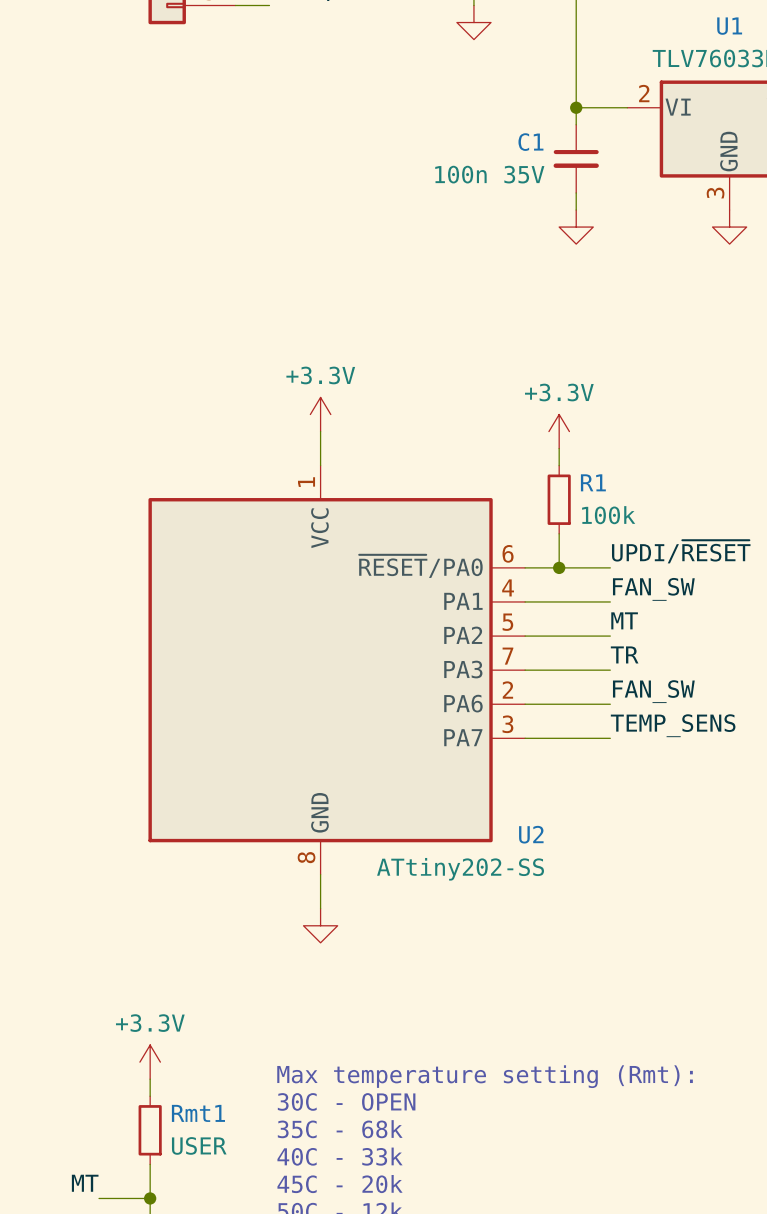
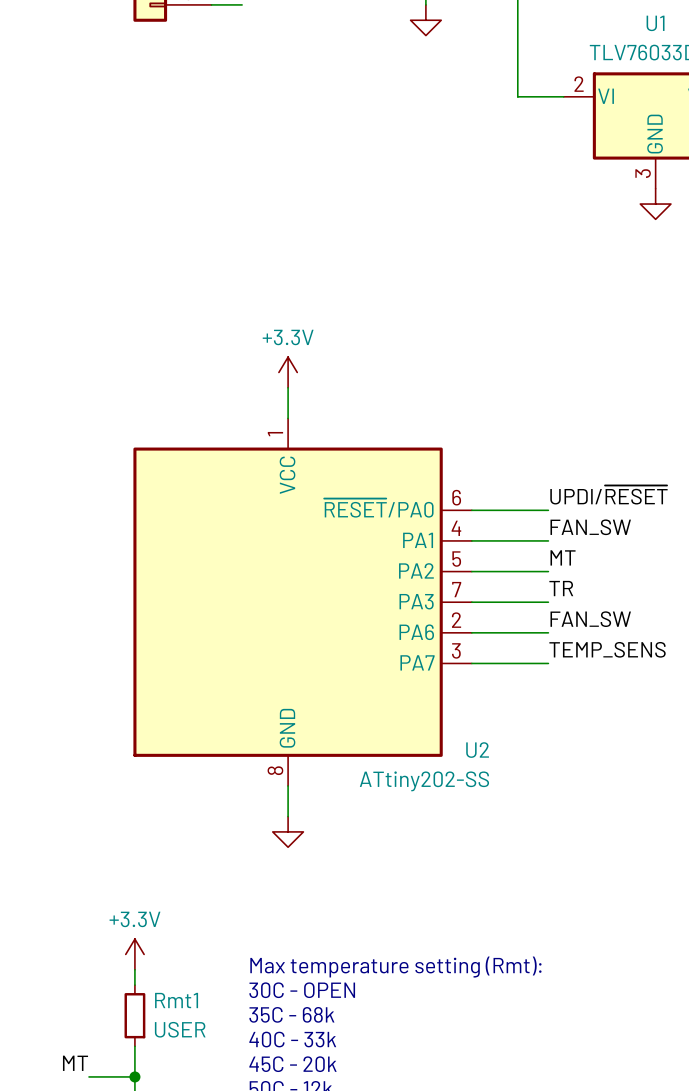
wire: (576, 107) (576, 124) -> none
junction: (576, 107) -> none
C1: 100n 35V (576, 158) -> none
wire: (576, 192) (576, 210) -> none
power symbol: (576, 227) -> none
power symbol: +3.3V (559, 431) -> none
wire: (559, 448) (559, 465) -> none
R1: 100k (559, 499) -> none
wire: (559, 533) (559, 567) -> none
junction: (559, 567) -> none

